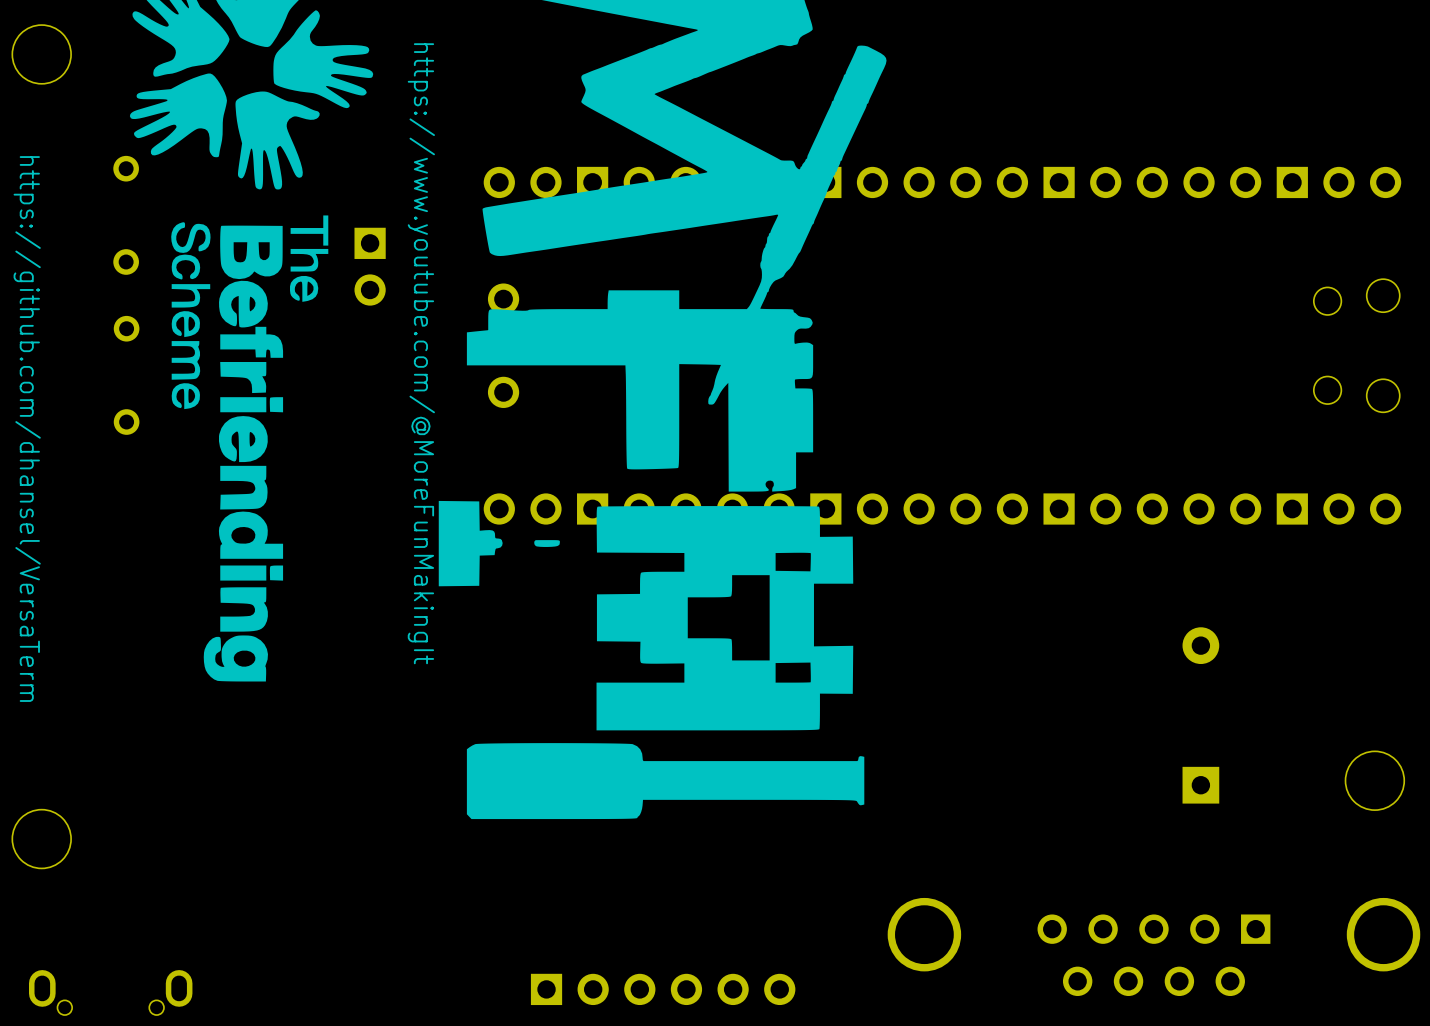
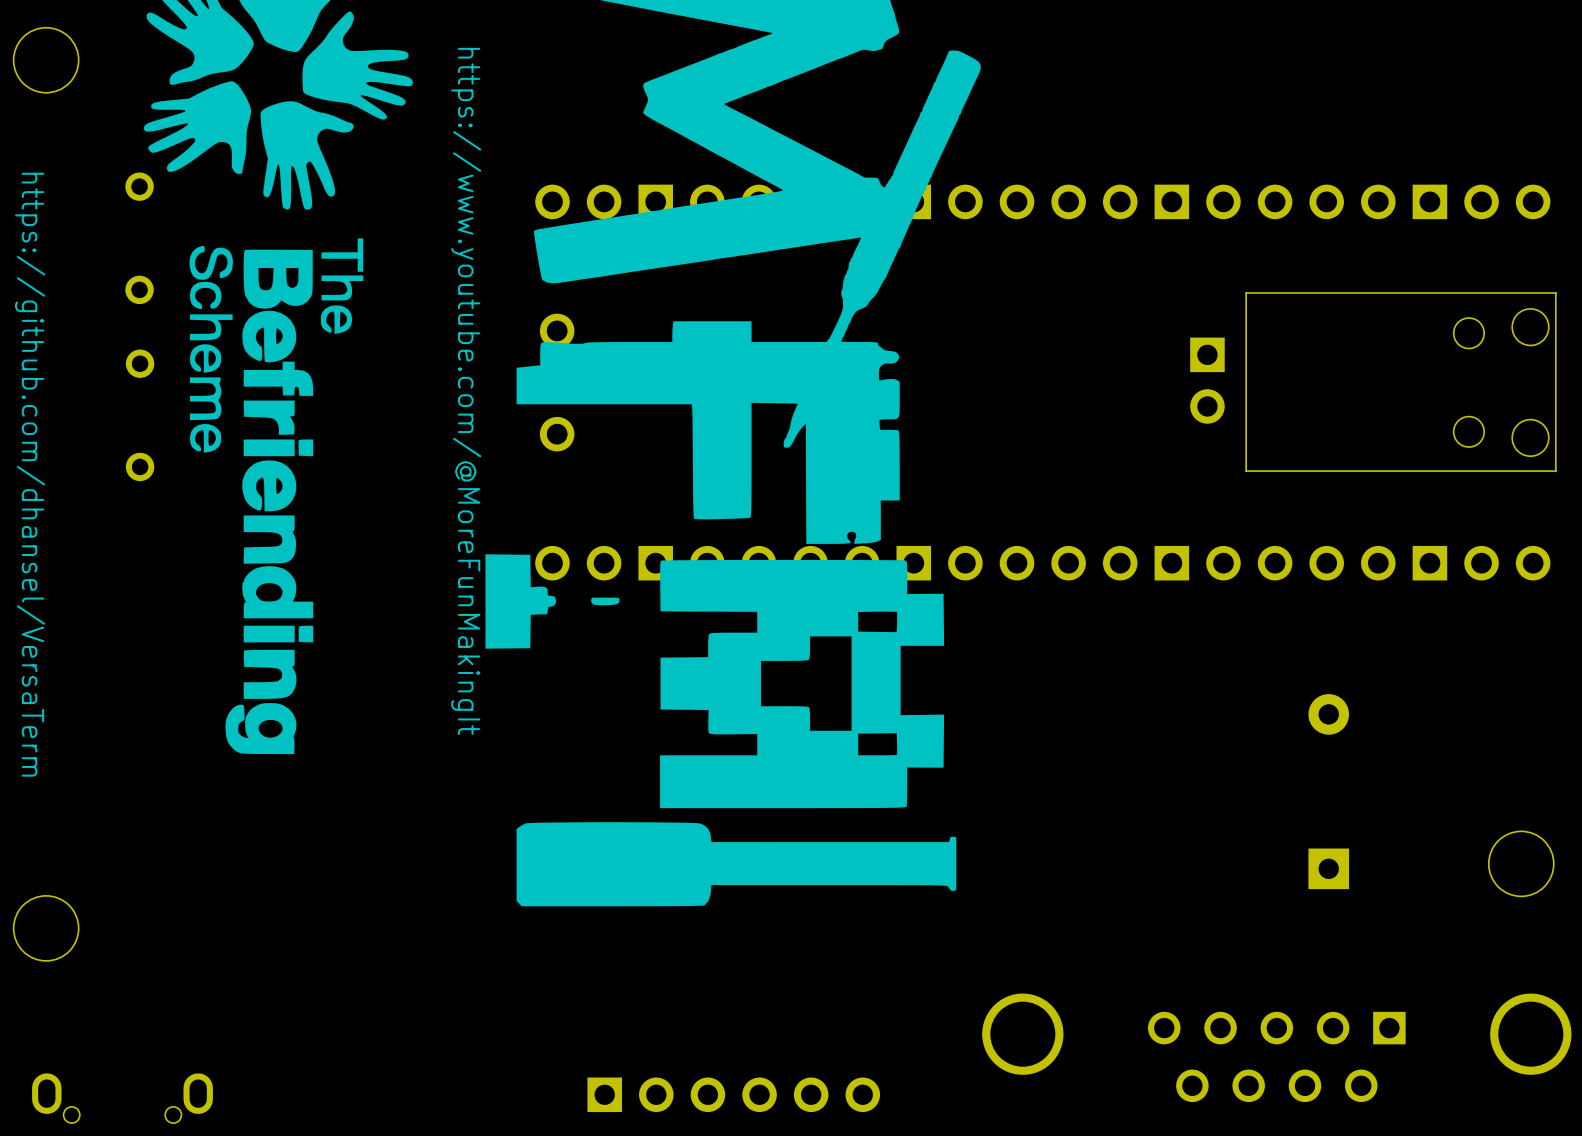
board edge: none -> (1555, 293) (1246, 293) (1246, 471) (1555, 471) (1555, 293)
part: (370, 266) -> none
part: none -> (1207, 380)

